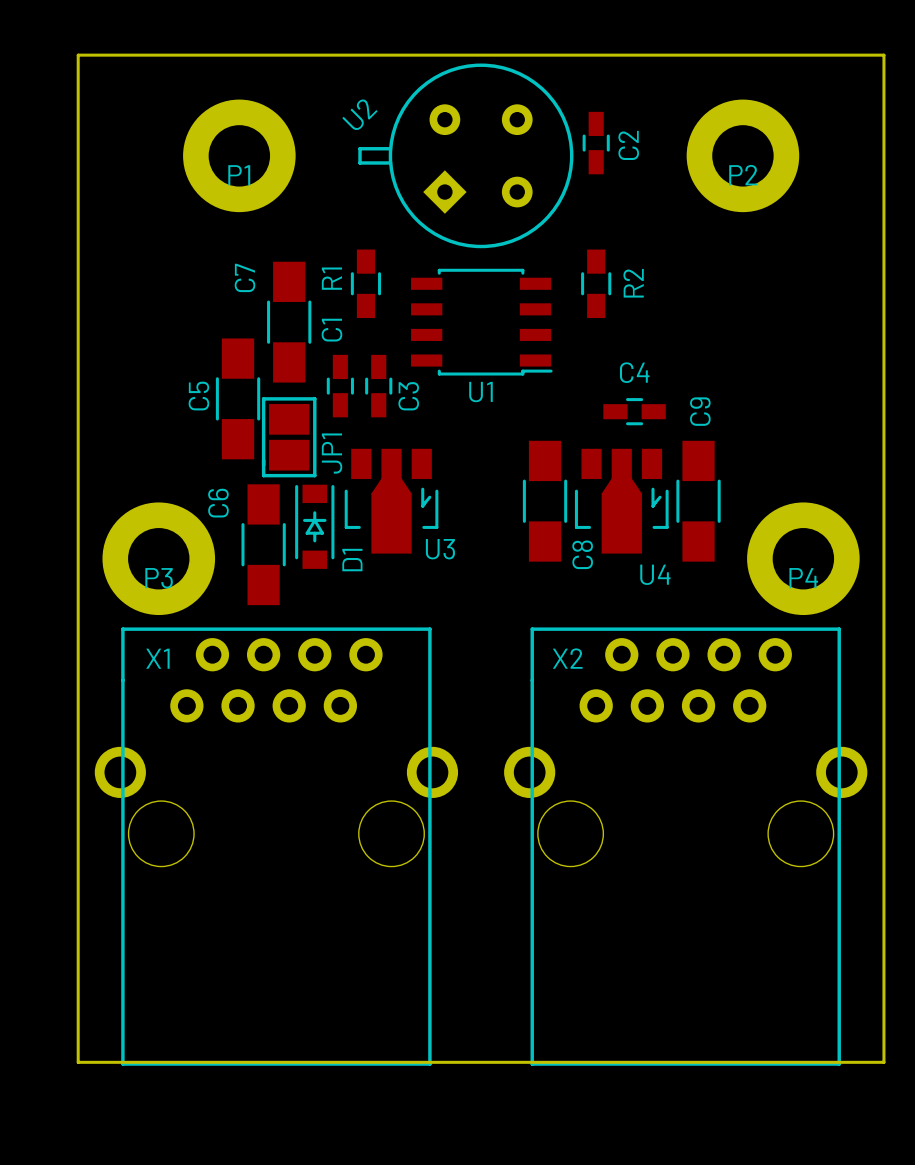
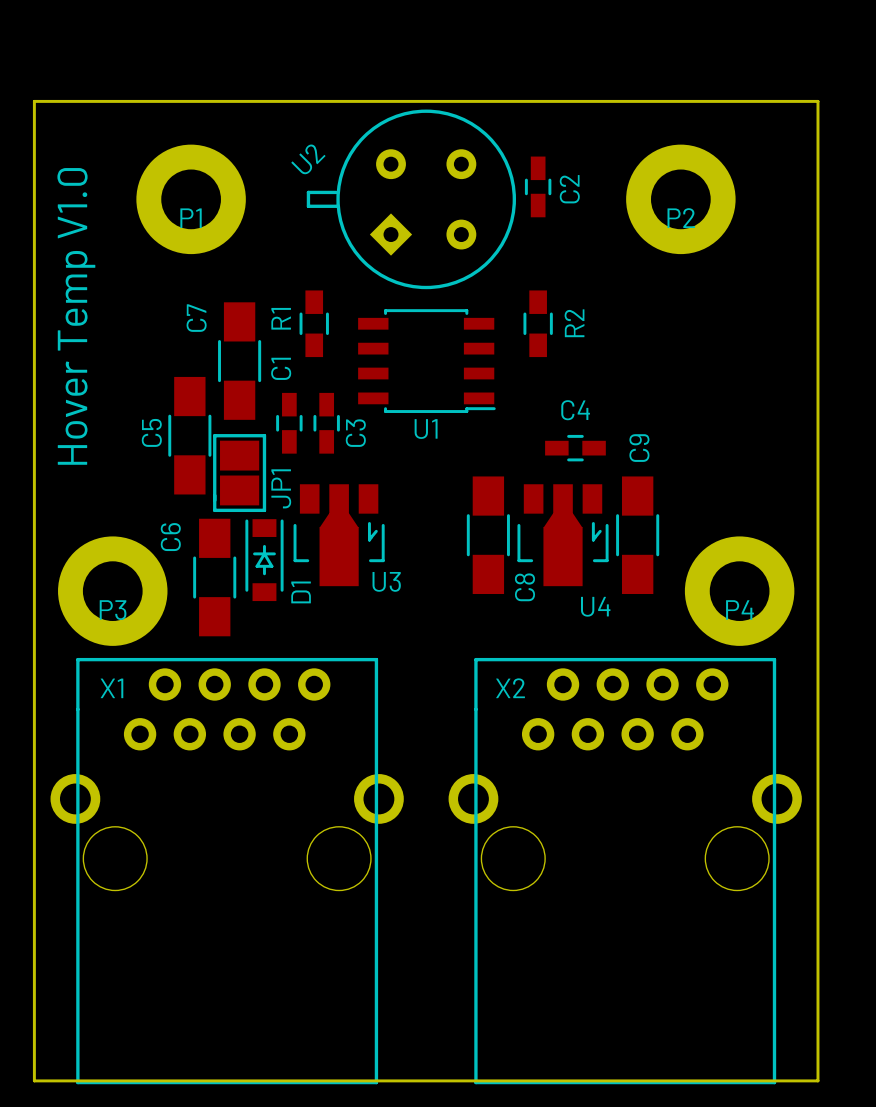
text: none -> Hover Temp V1.0 (76, 316)

